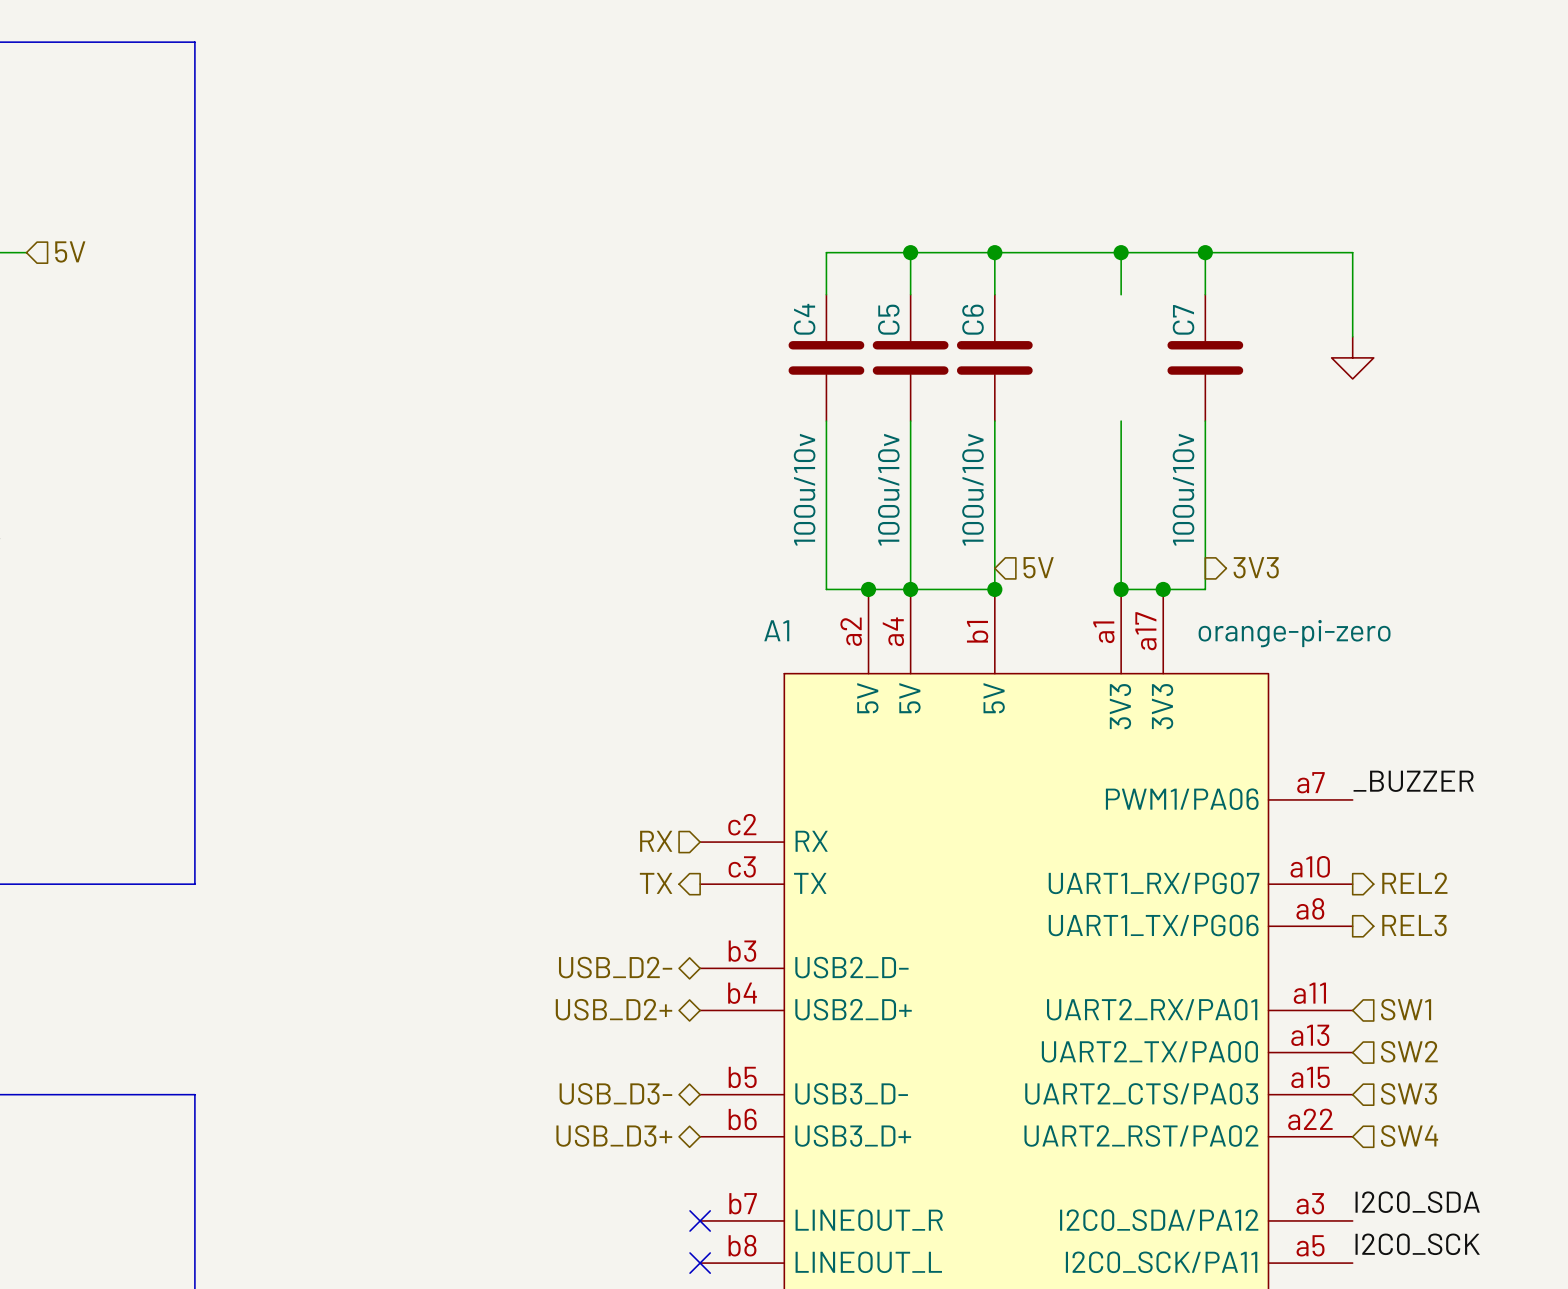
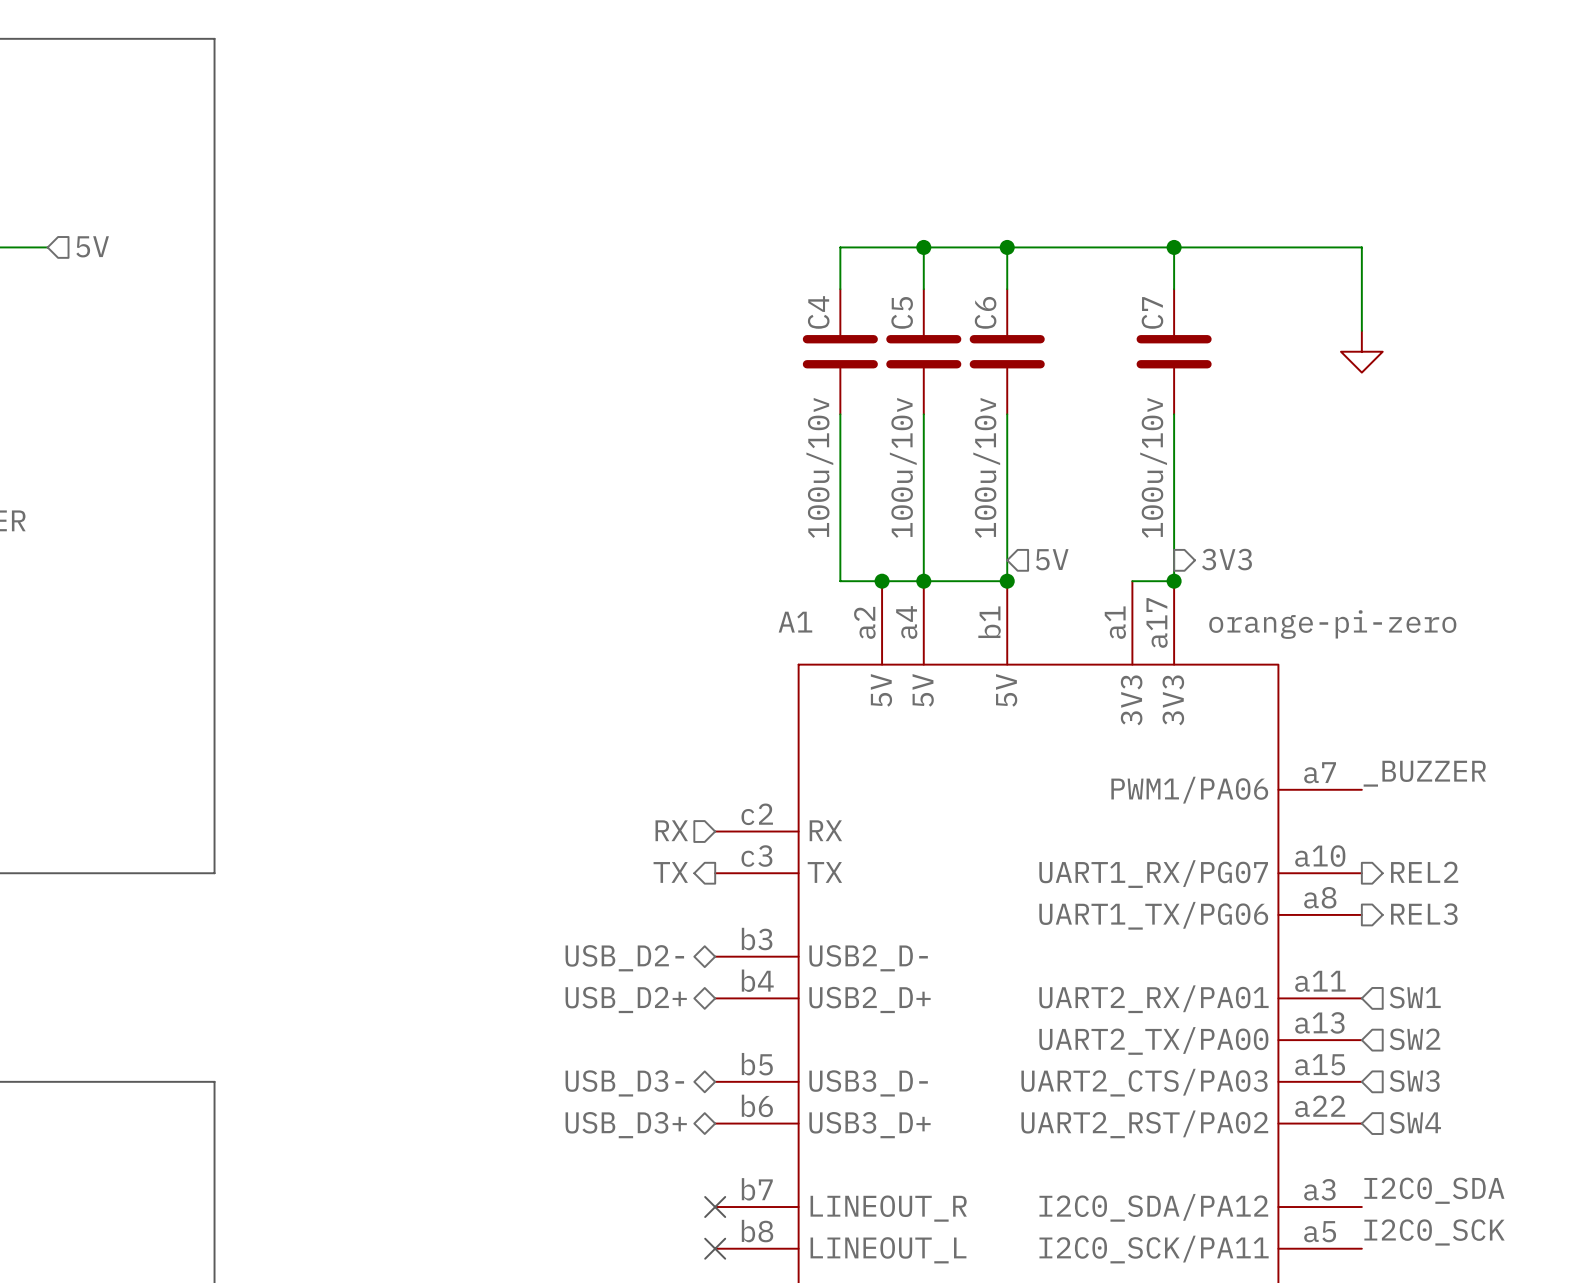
wire: (1121, 252) (1121, 294) -> (1174, 247) (1174, 289)
junction: (1121, 252) -> none
junction: none -> (1174, 247)
wire: (1205, 252) (1205, 294) -> none
junction: (1205, 252) -> none
C7 position: (1205, 357) -> (1174, 351)
wire: (1121, 421) (1121, 589) -> none
wire: (1205, 421) (1205, 589) (1163, 589) -> (1174, 414) (1174, 581)
hierarchical label position: 3V3 (1256, 567) -> 3V3 (1226, 559)
junction: (1121, 589) -> none

